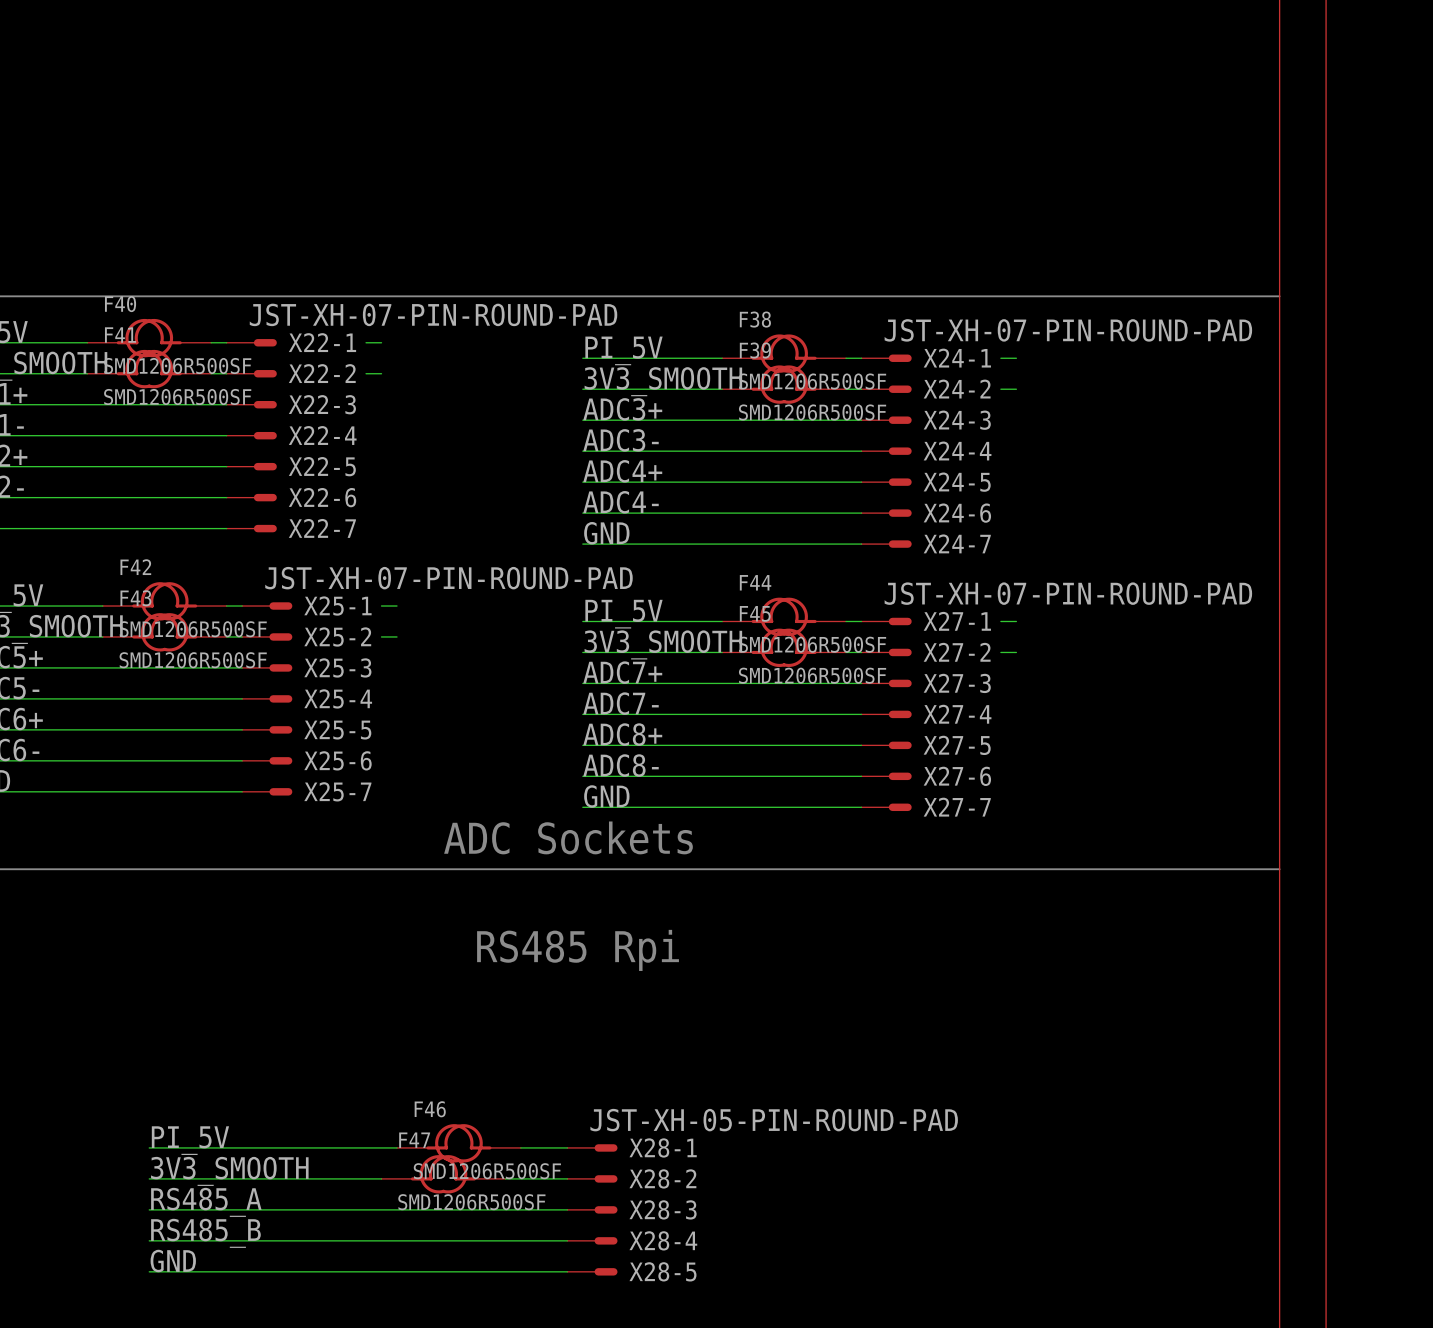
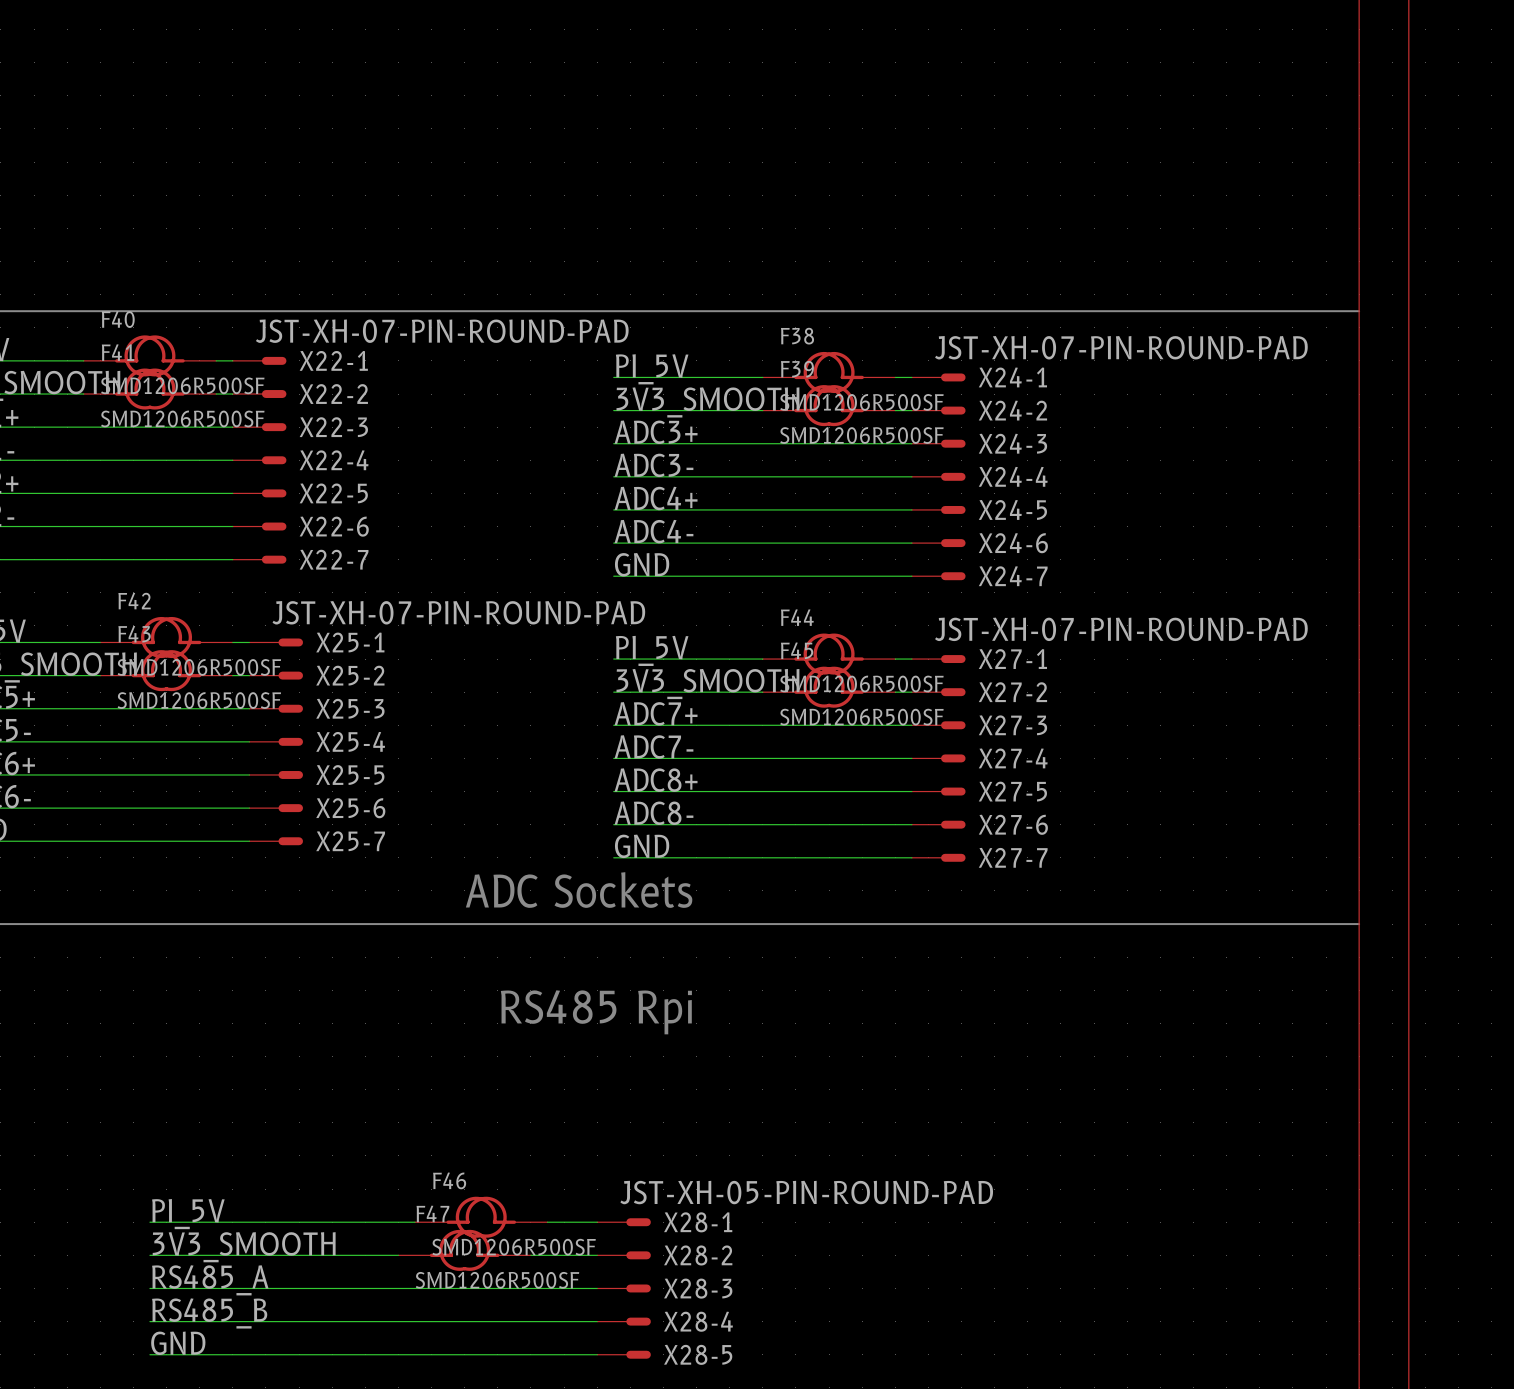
wire: (366, 342) (381, 342) -> none
wire: (1000, 358) (1016, 358) -> none
wire: (366, 373) (381, 373) -> none
wire: (1000, 389) (1016, 389) -> none
wire: (381, 606) (397, 606) -> none
wire: (1000, 621) (1016, 621) -> none
wire: (381, 636) (397, 636) -> none
wire: (1000, 652) (1016, 652) -> none

